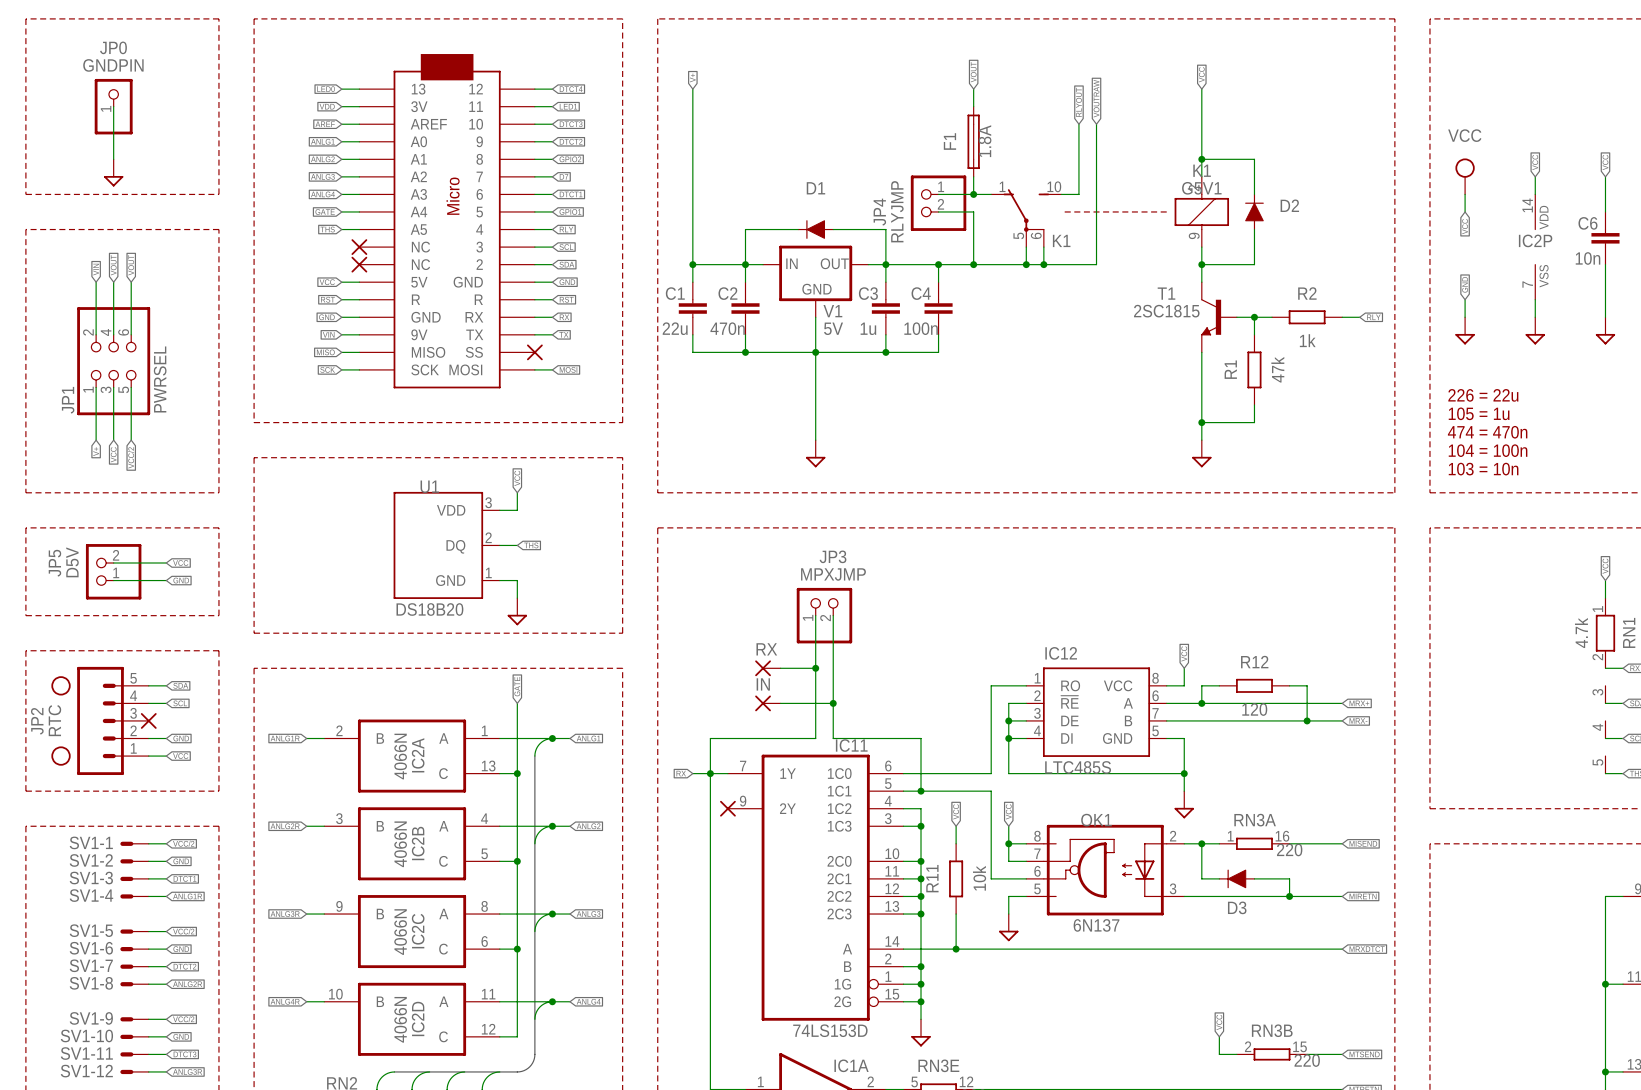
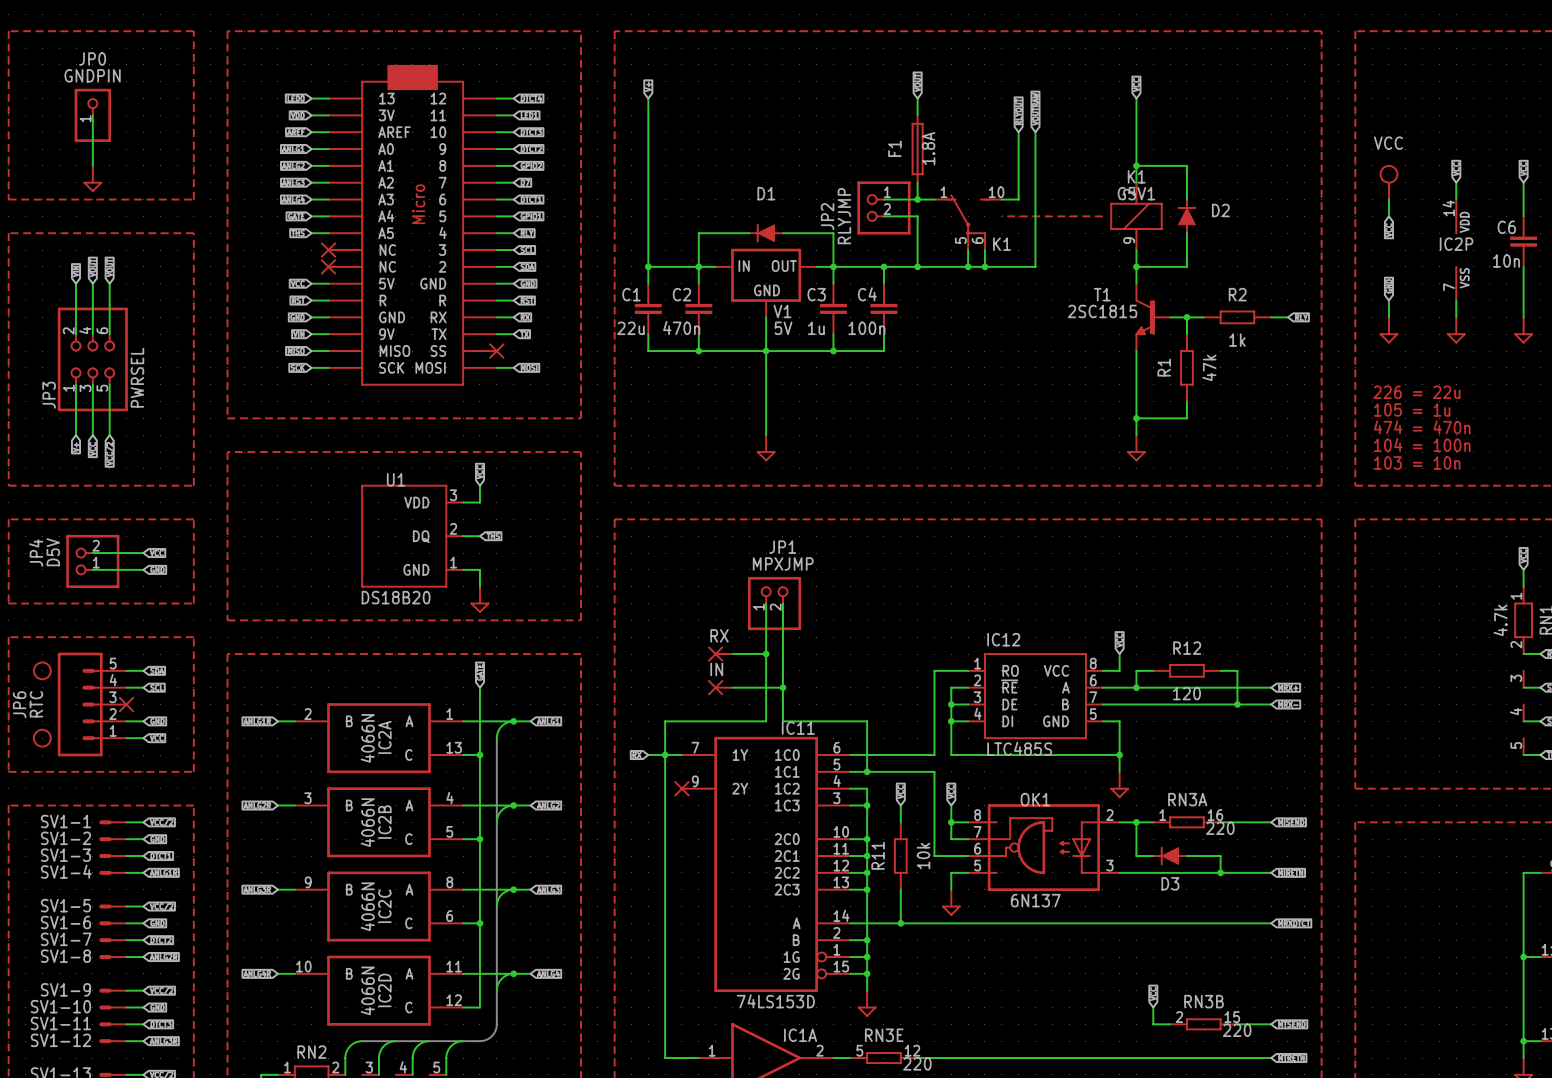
JP4 name: JP4 (879, 212) -> JP2 (827, 216)
JP1 name: JP1 (68, 400) -> JP3 (49, 395)
JP3 name: JP3 (833, 556) -> JP1 (782, 547)
JP5 name: JP5 (54, 563) -> JP4 (36, 553)
JP2 name: JP2 (37, 721) -> JP6 (19, 704)

